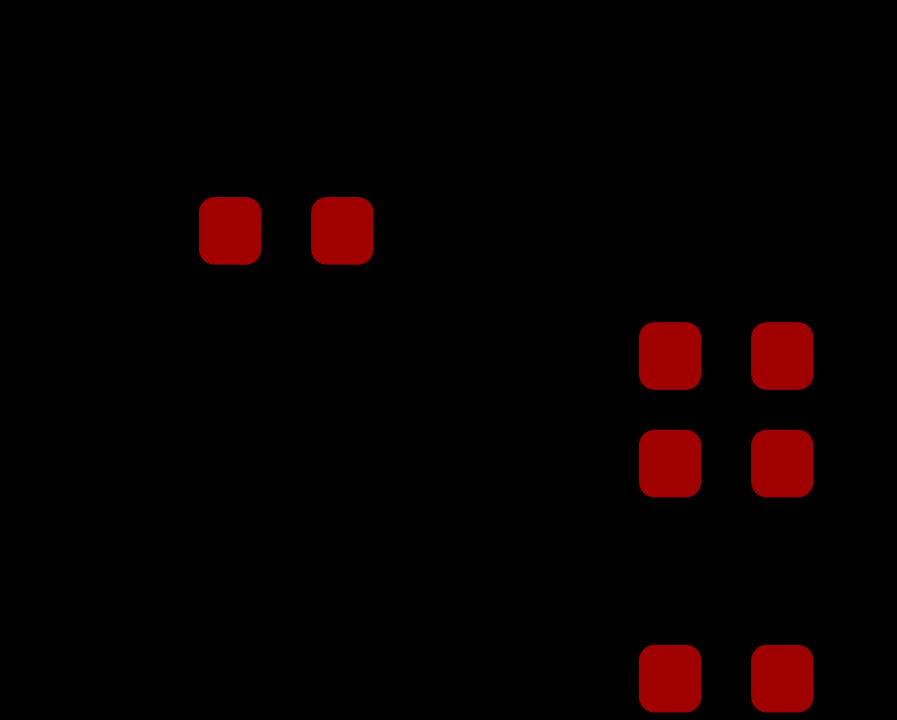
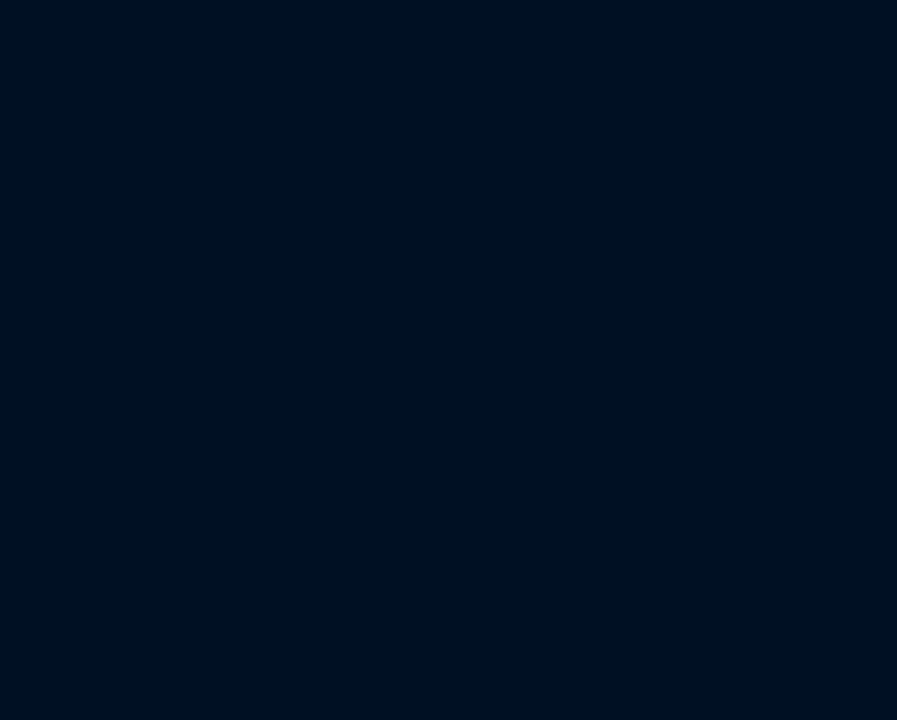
part: (286, 230) -> none
part: (726, 356) -> none
part: (726, 463) -> none
part: (726, 678) -> none

